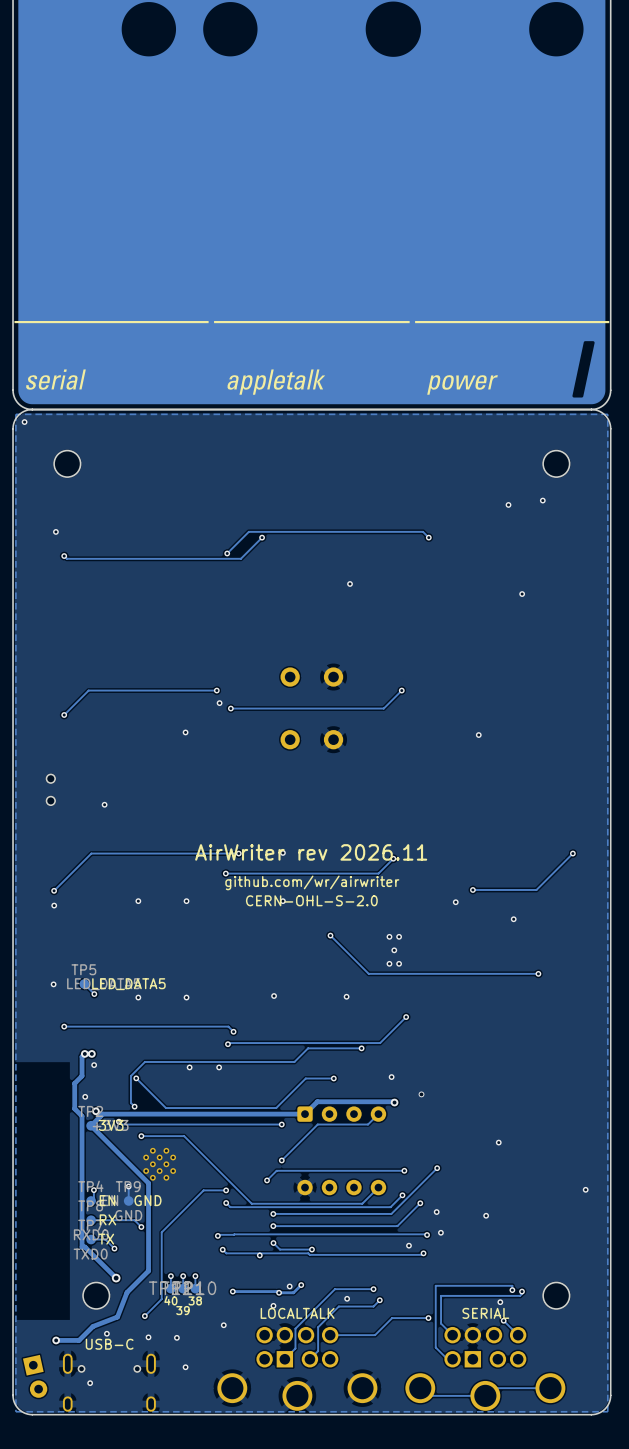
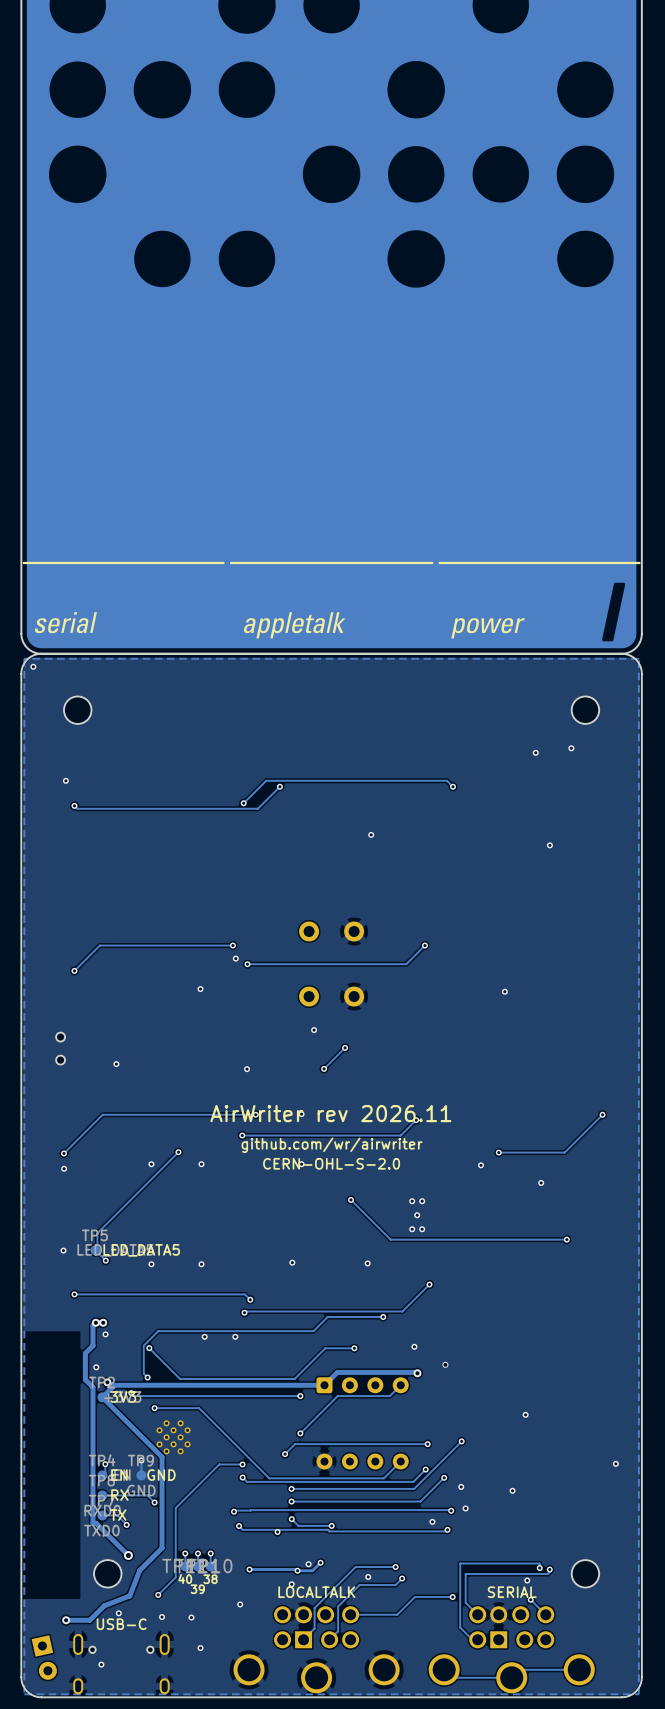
via: none -> (314, 1030)
track: none -> (345, 1047) (324, 1068)
via: none -> (345, 1047)
via: none -> (247, 1069)
via: none -> (324, 1068)
track: none -> (178, 1152) (97, 1233) (97, 1246) (95, 1250)
via: none -> (178, 1152)

